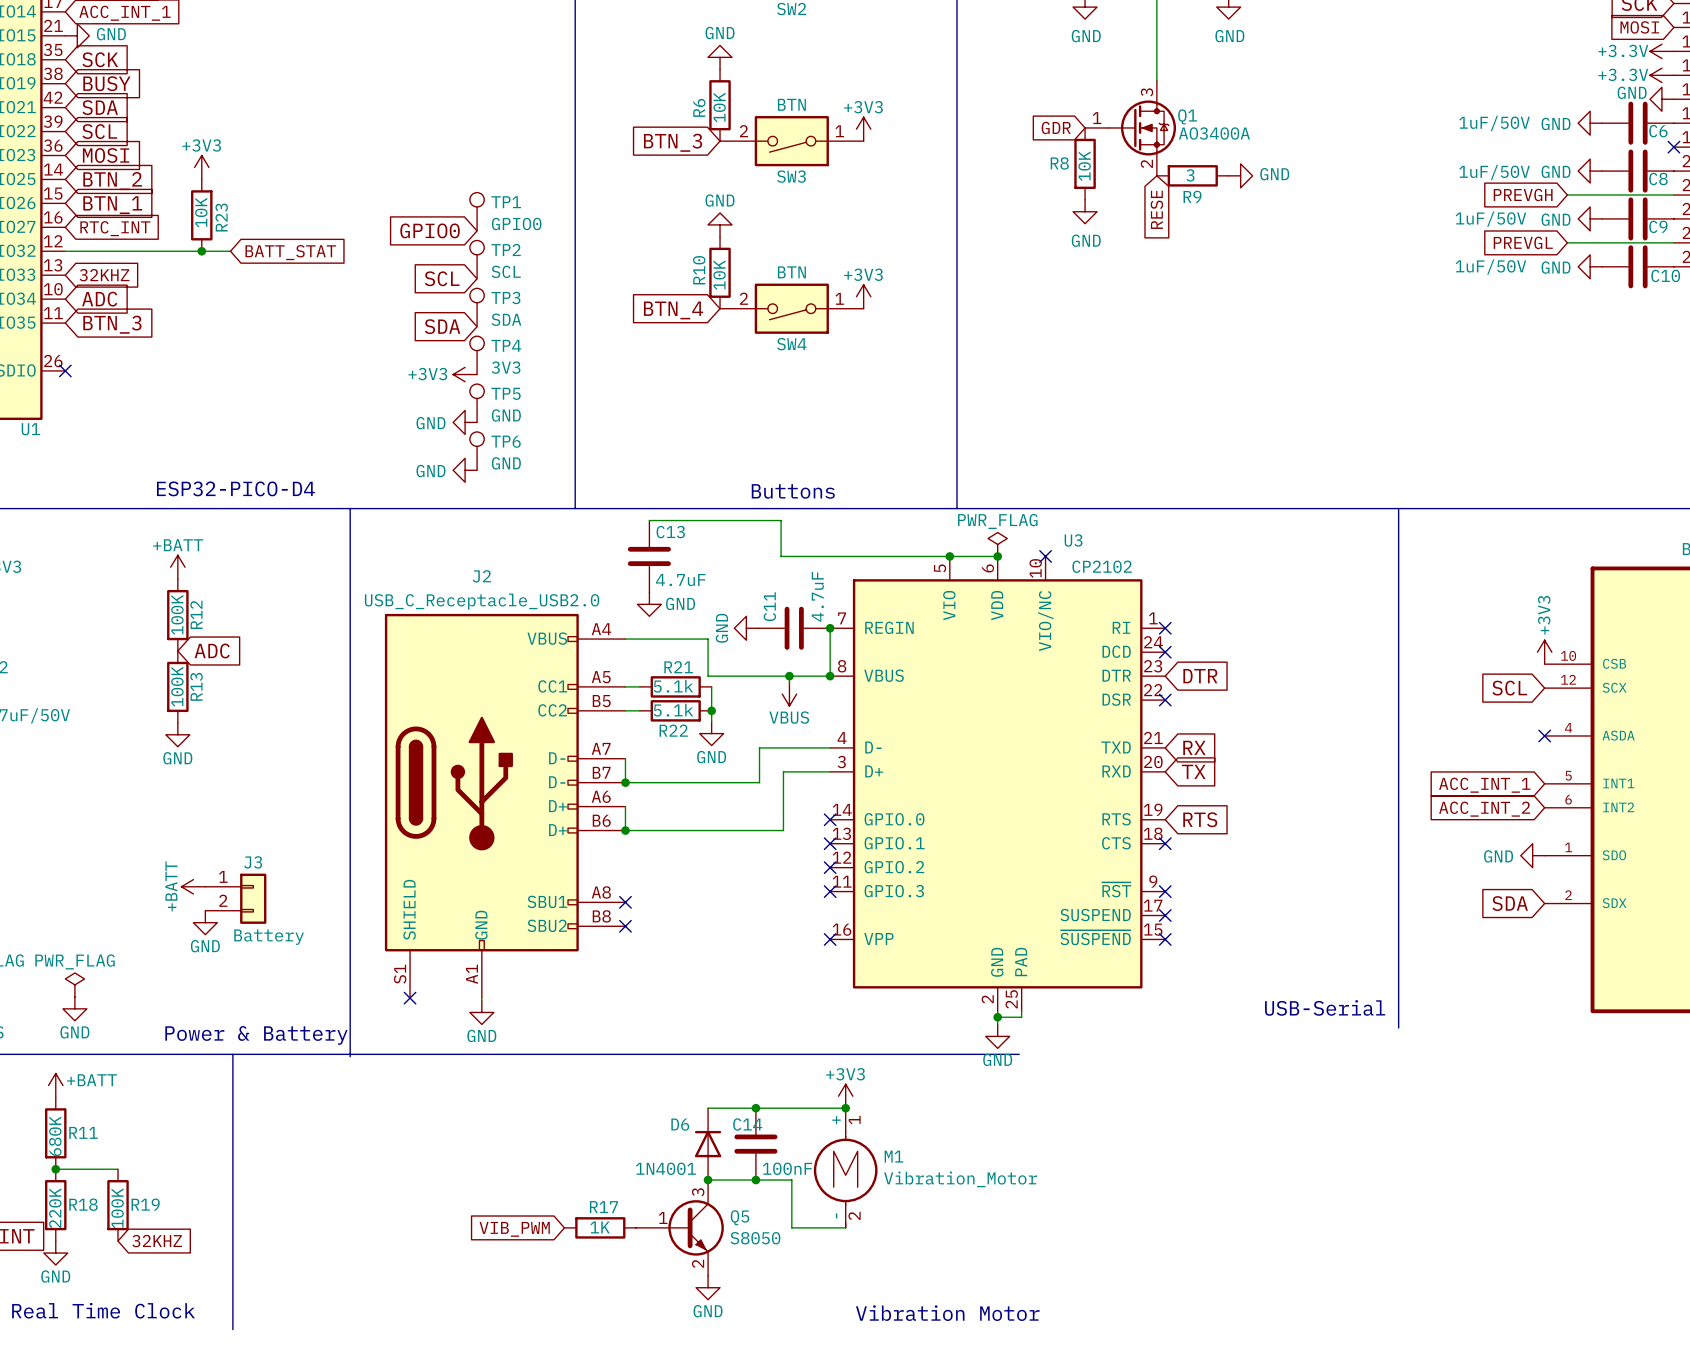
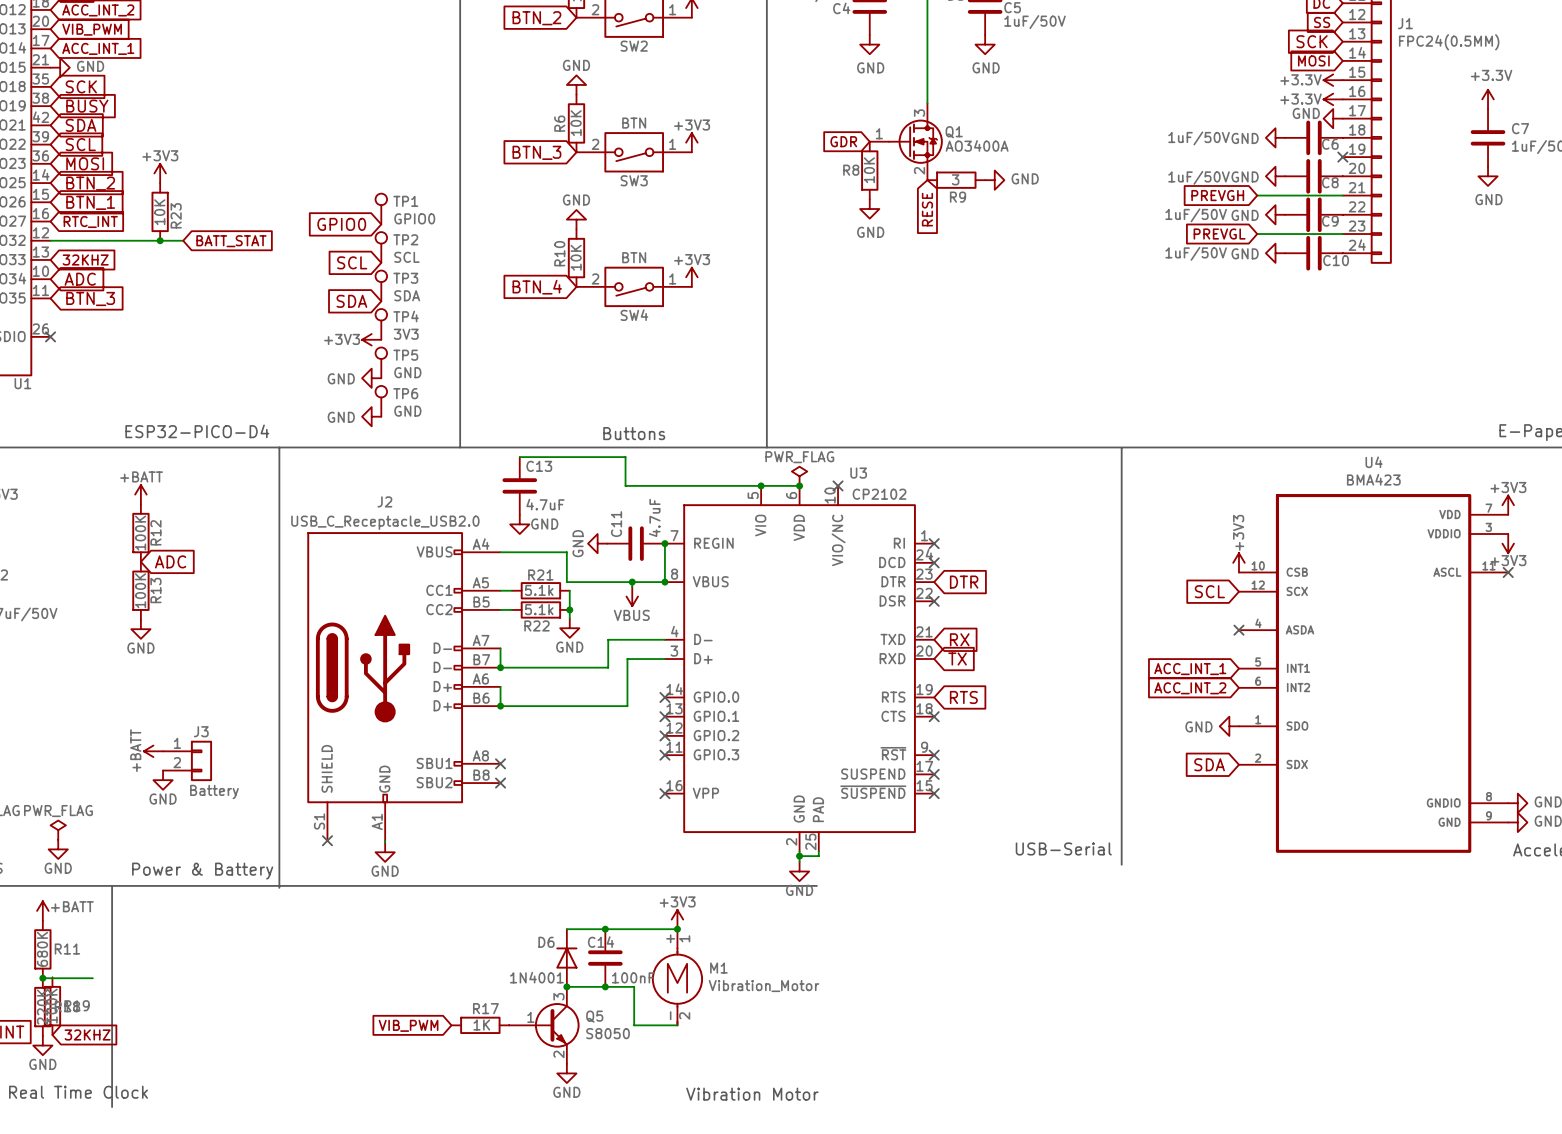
line: (232, 1054) (232, 1329) -> (112, 885) (112, 1107)
R19 position: (118, 1205) -> (52, 1006)
global label position: 32KHZ (157, 1241) -> 32KHZ (87, 1034)

